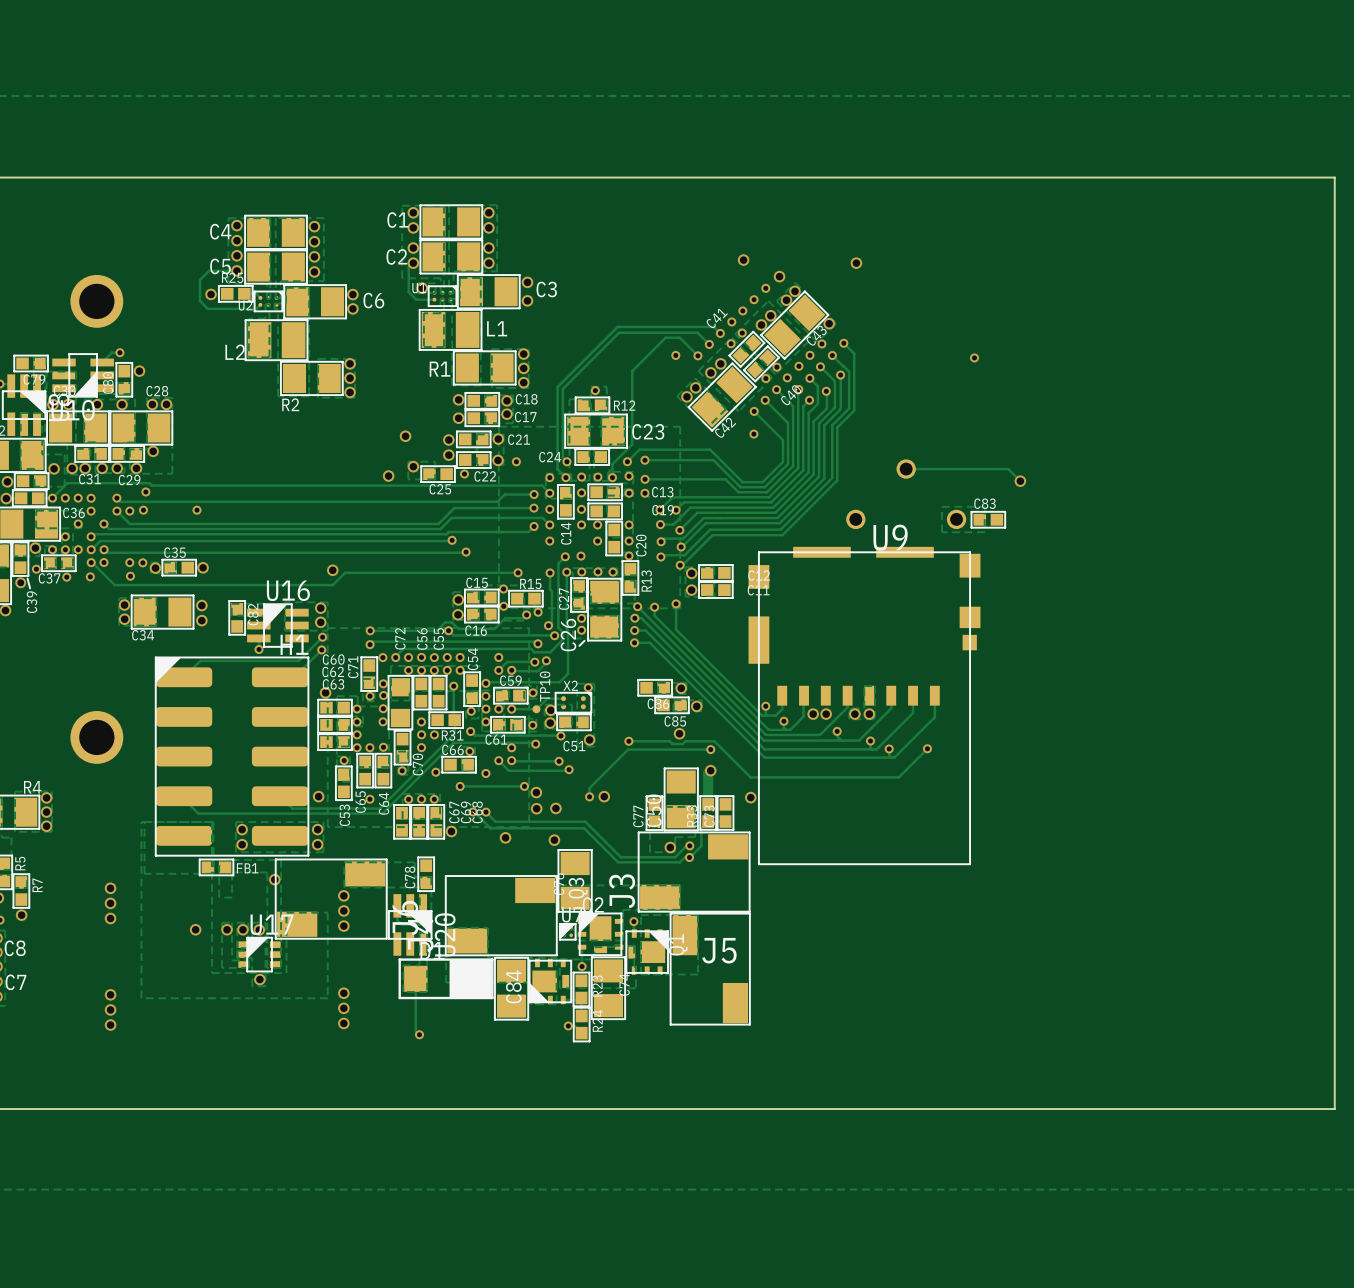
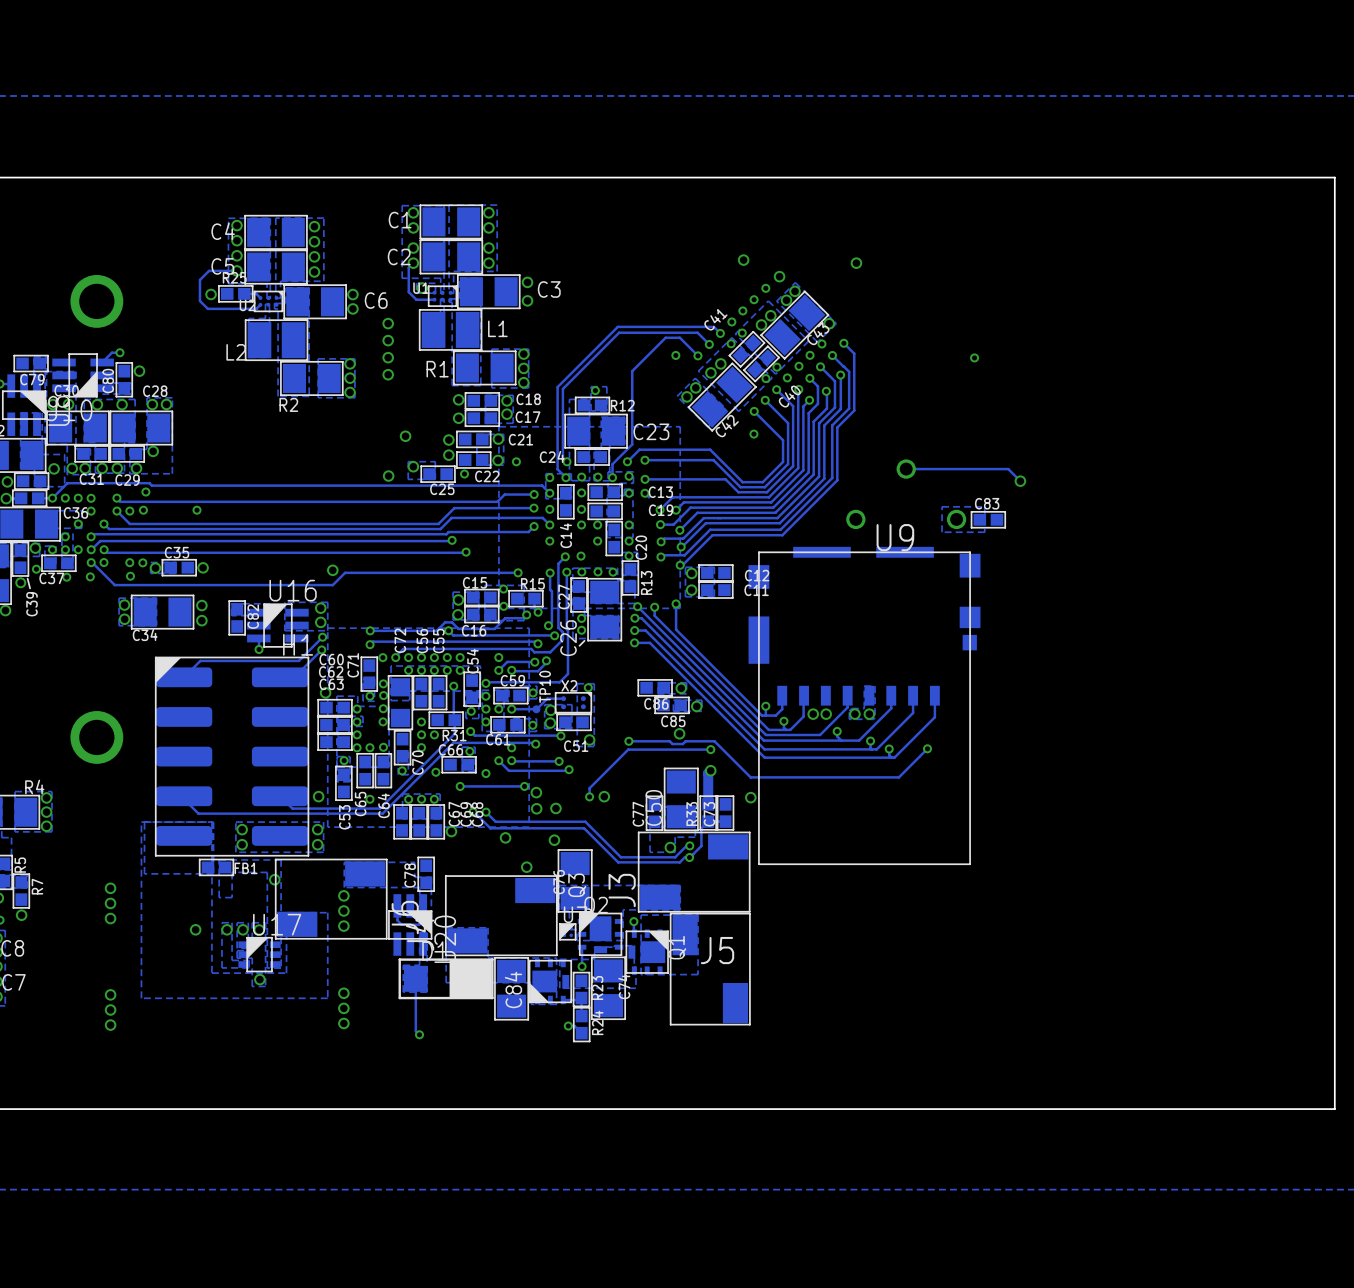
via: none -> (388, 323)
via: none -> (388, 340)
via: none -> (388, 357)
via: none -> (388, 374)
via: none -> (526, 867)

